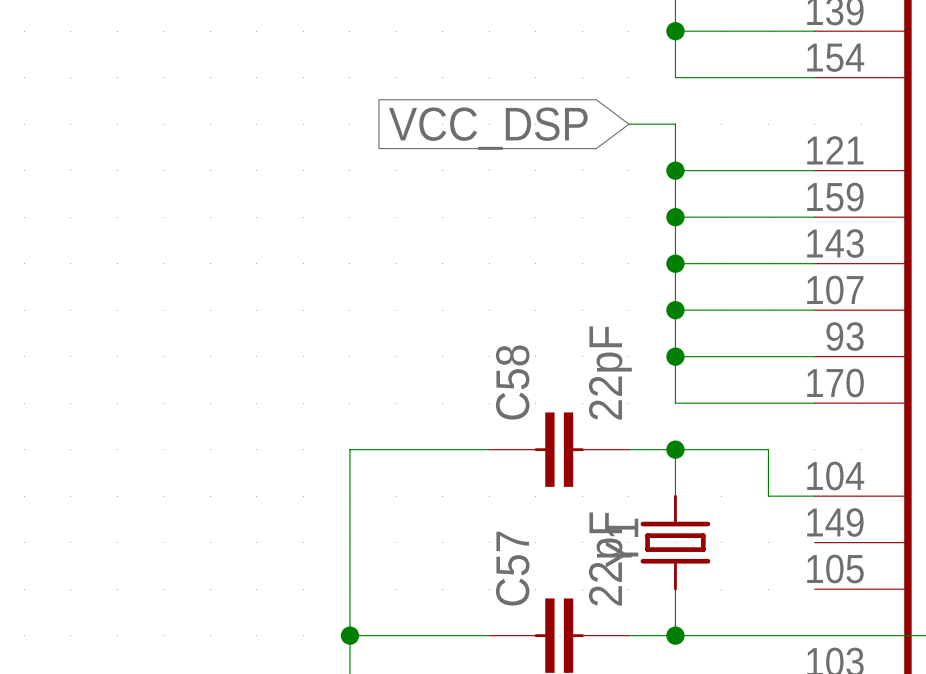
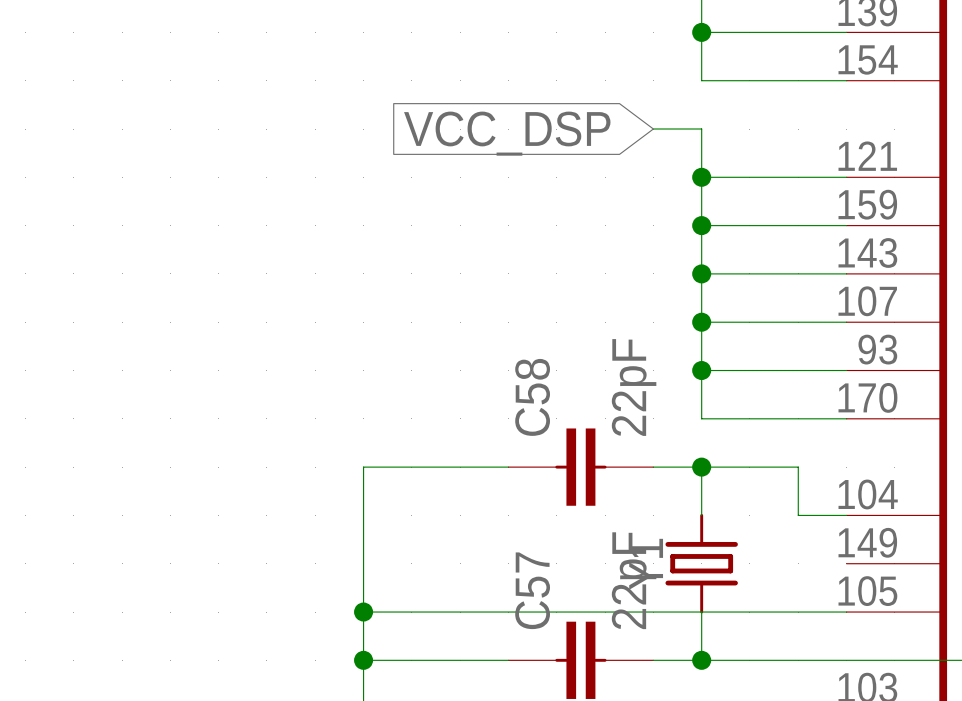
wire: none -> (363, 612) (846, 612)
junction: none -> (363, 612)

